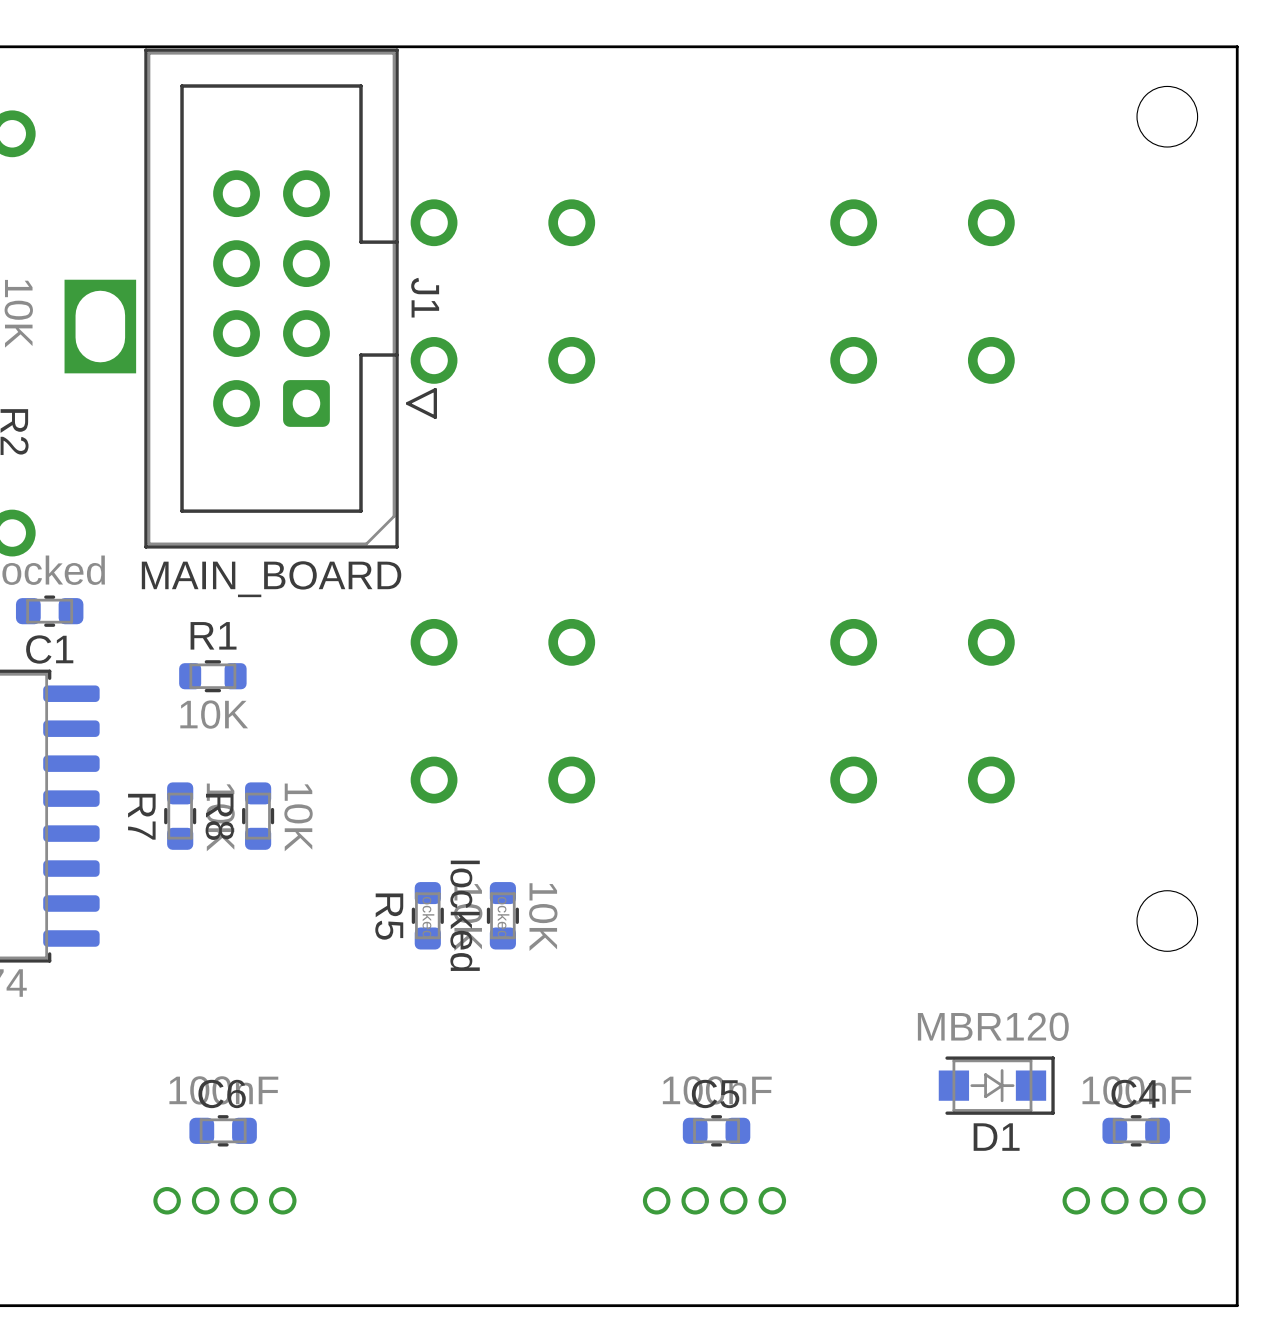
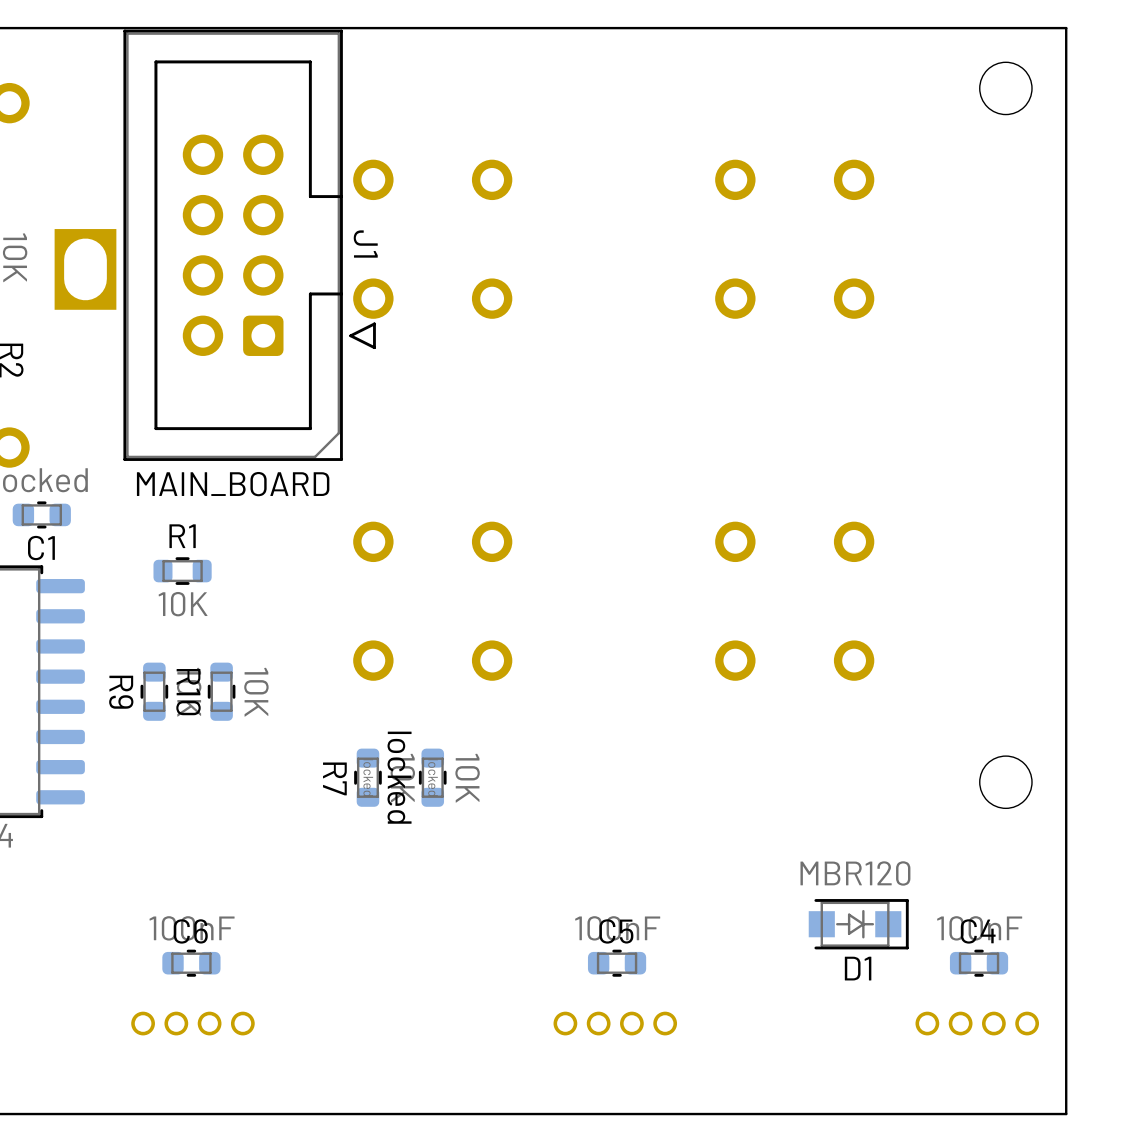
R7 name: R7 (141, 816) -> R9 (121, 692)
R8 name: R8 (219, 816) -> R10 (188, 692)
R5 name: R5 (389, 916) -> R7 (334, 778)

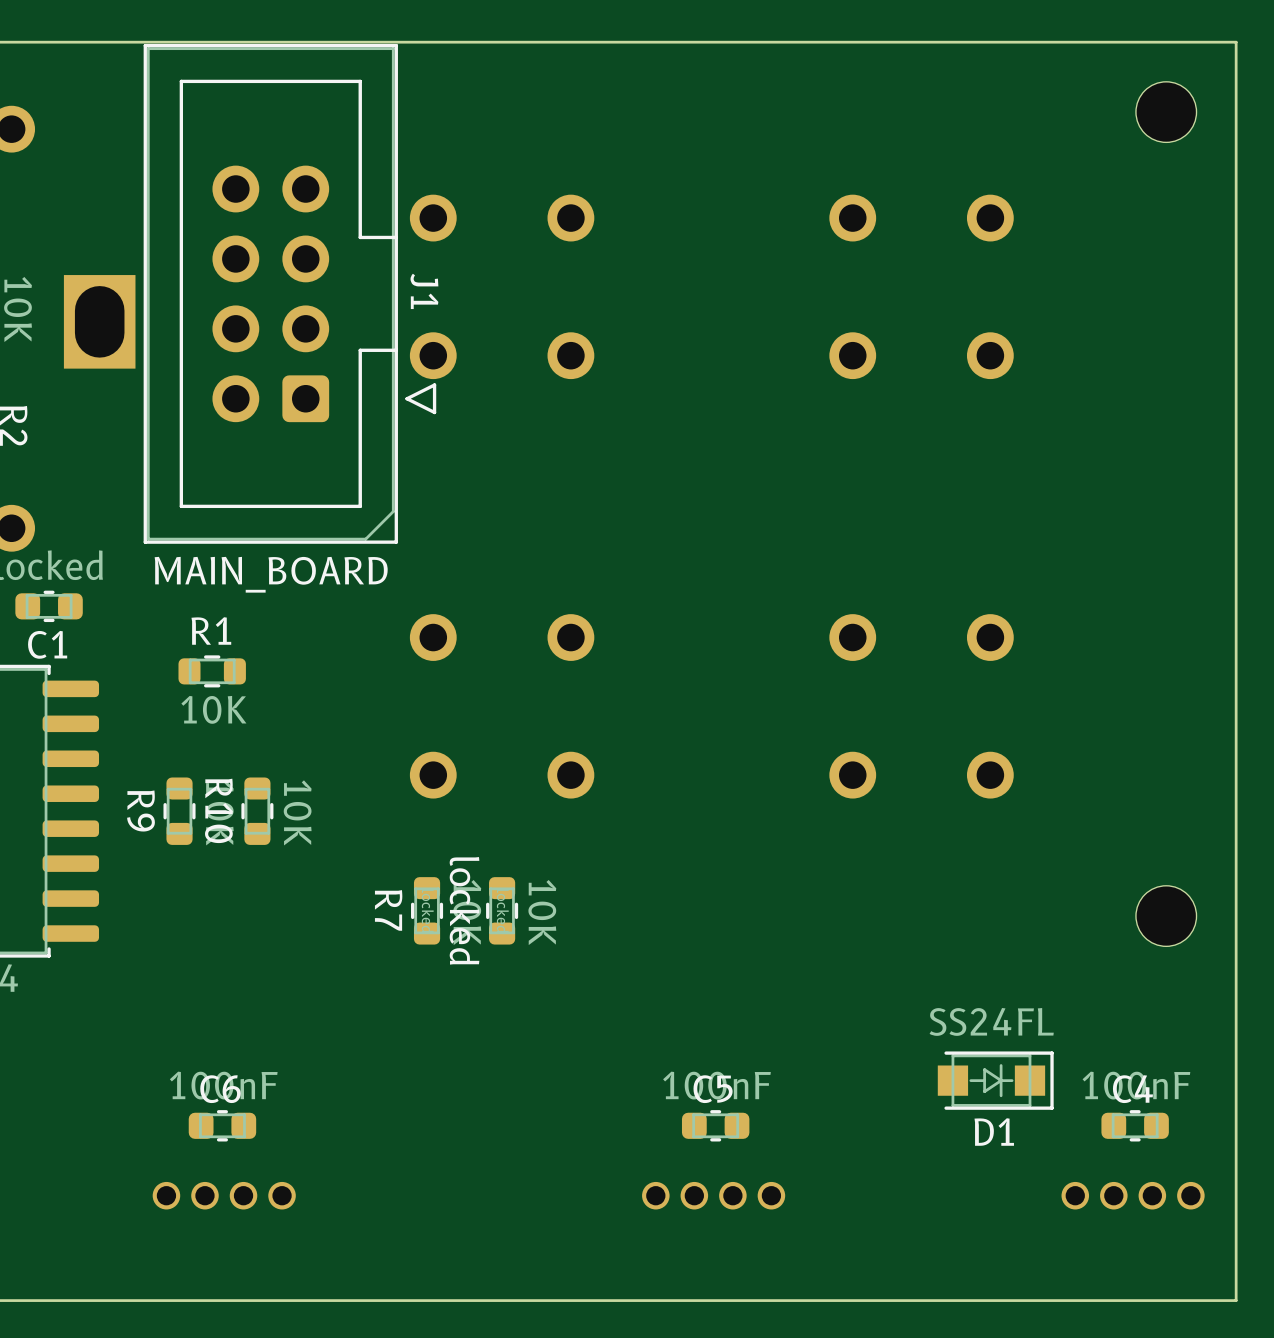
D1 value: MBR120 (855, 873) -> SS24FL (991, 1021)

